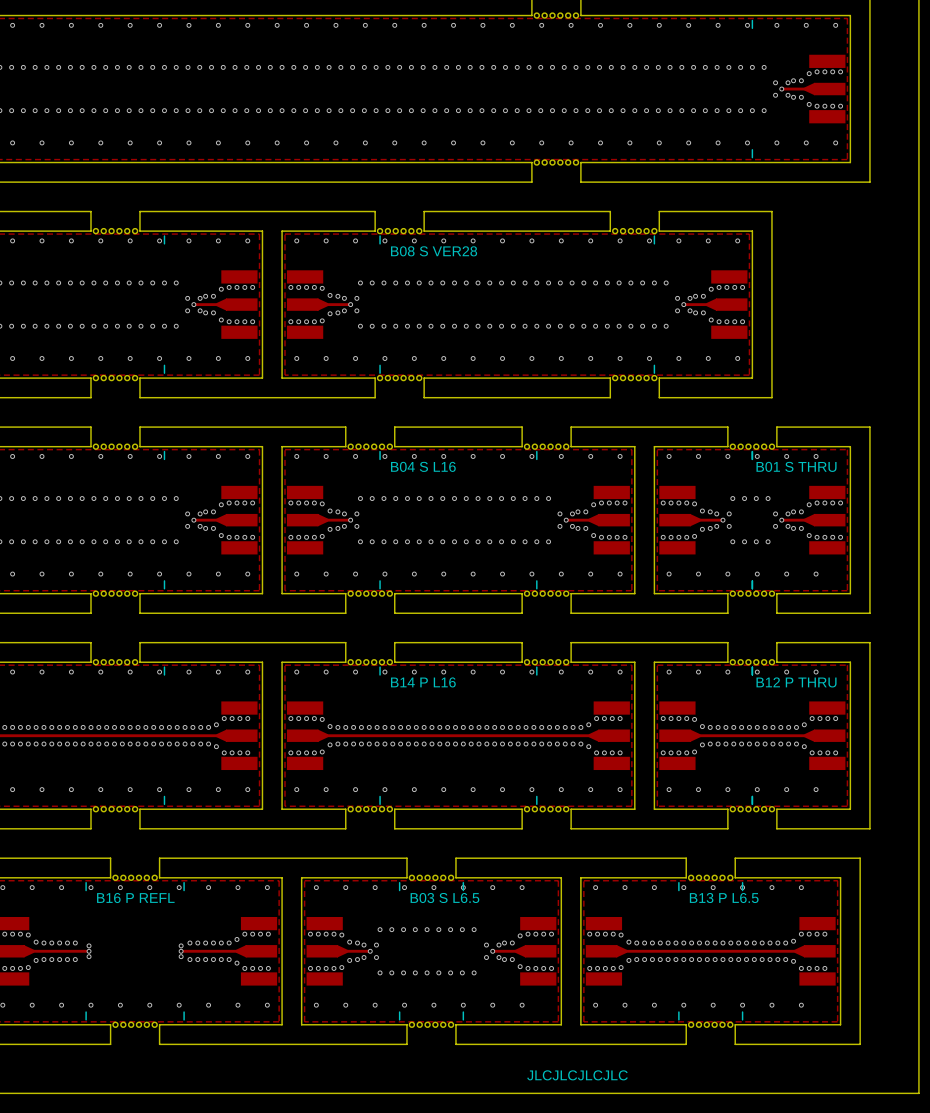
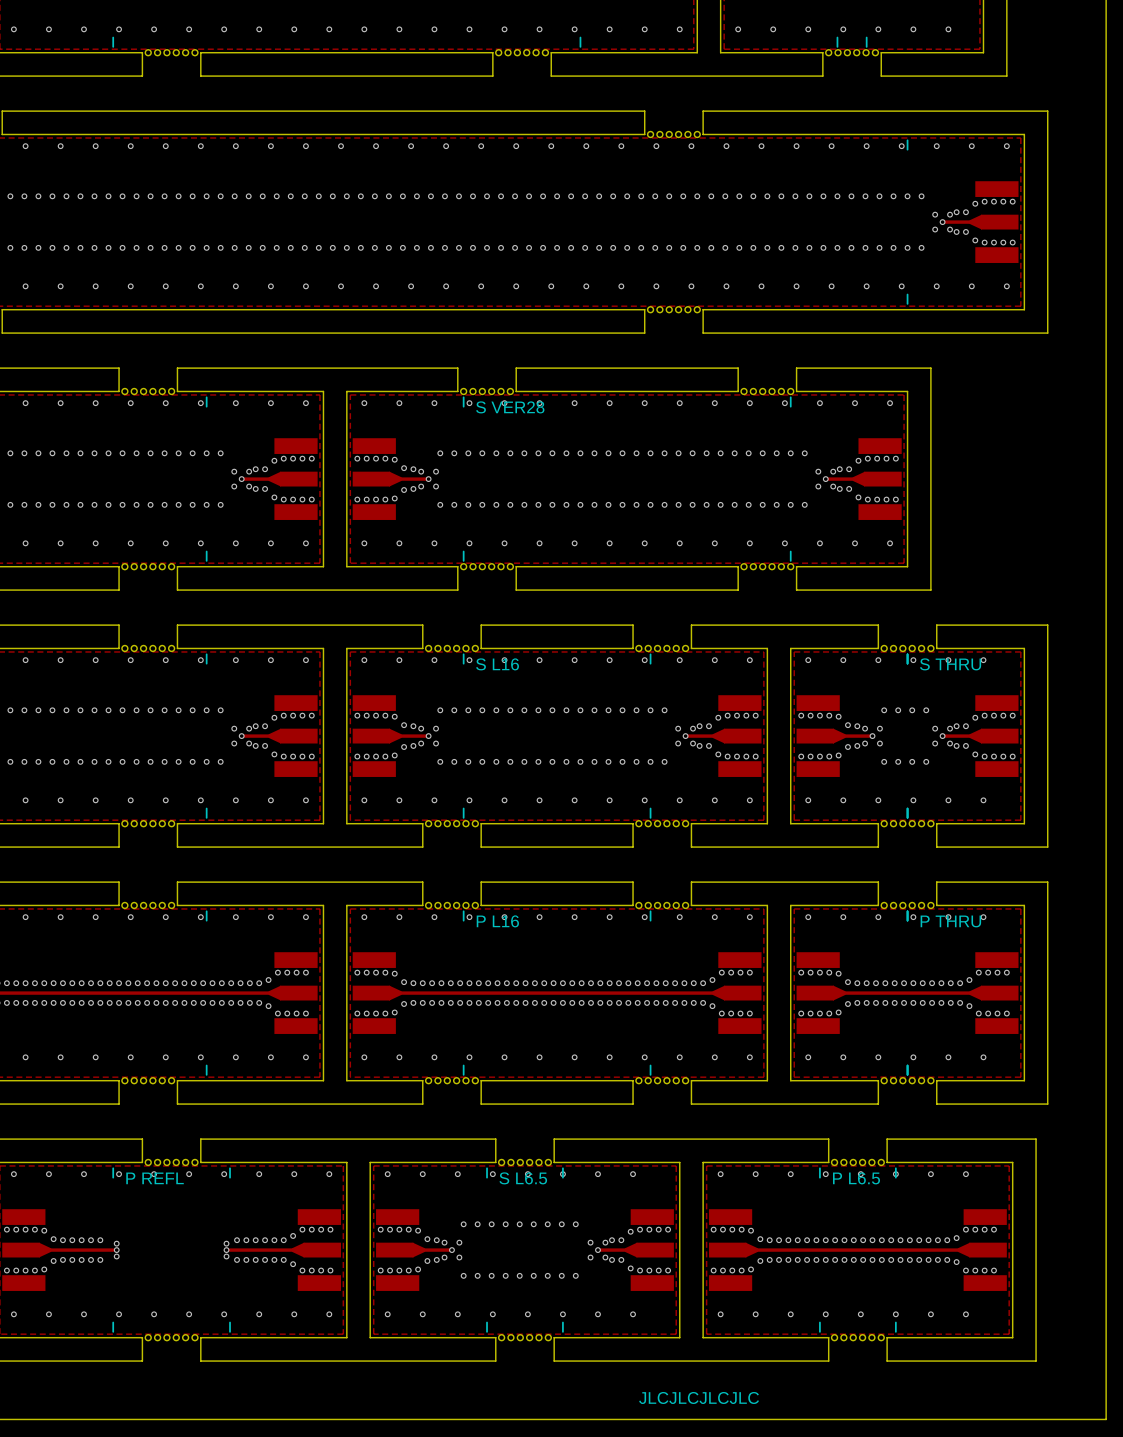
text: B08 S VER28 (434, 251) -> S VER28 (510, 407)
text: B04 S L16 (423, 466) -> S L16 (497, 664)
text: B01 S THRU (796, 466) -> S THRU (950, 664)
text: B14 P L16 (423, 682) -> P L16 (497, 921)
text: B12 P THRU (796, 682) -> P THRU (950, 921)
text: B16 P REFL (135, 898) -> P REFL (155, 1178)
text: B03 S L6.5 (444, 898) -> S L6.5 (523, 1178)
text: B13 P L6.5 (724, 898) -> P L6.5 (856, 1178)

